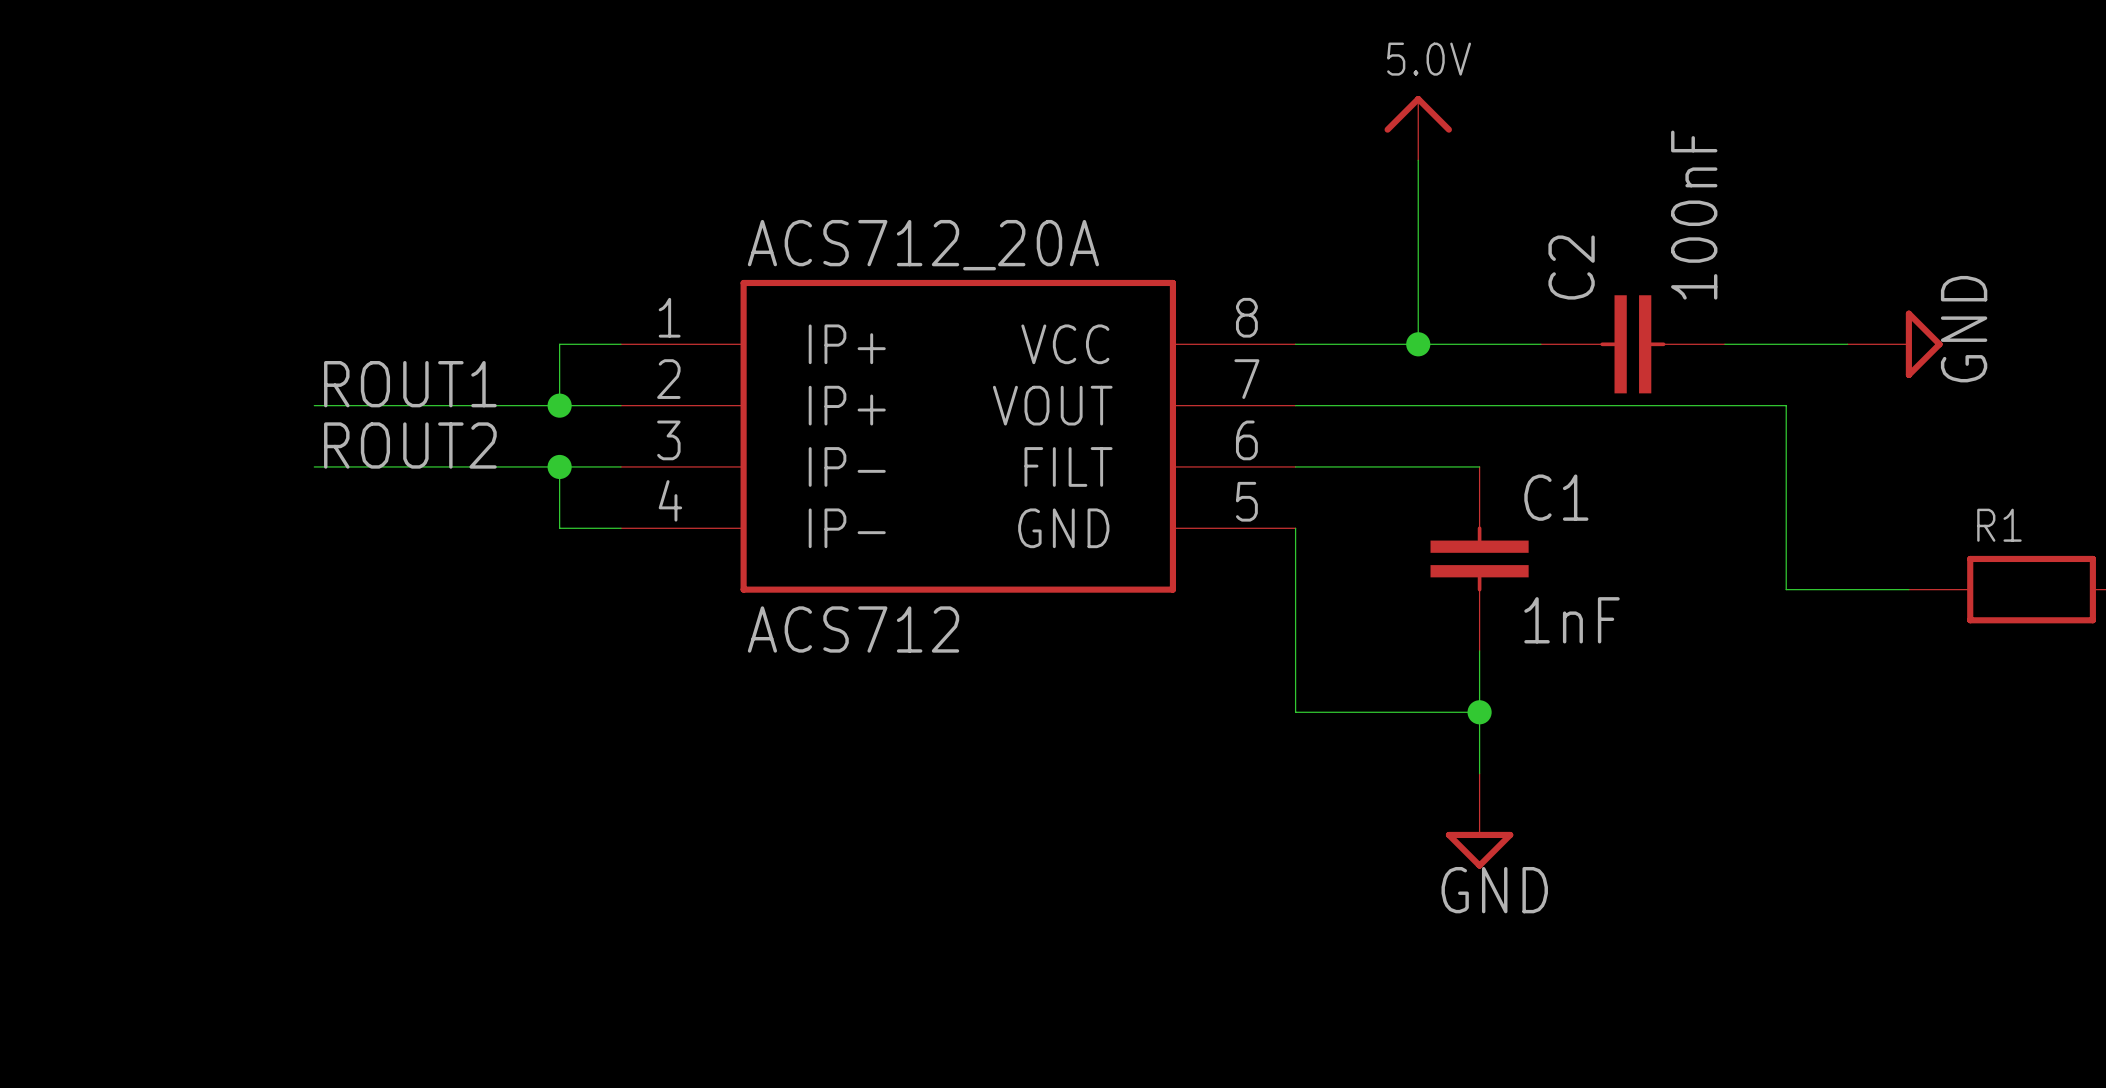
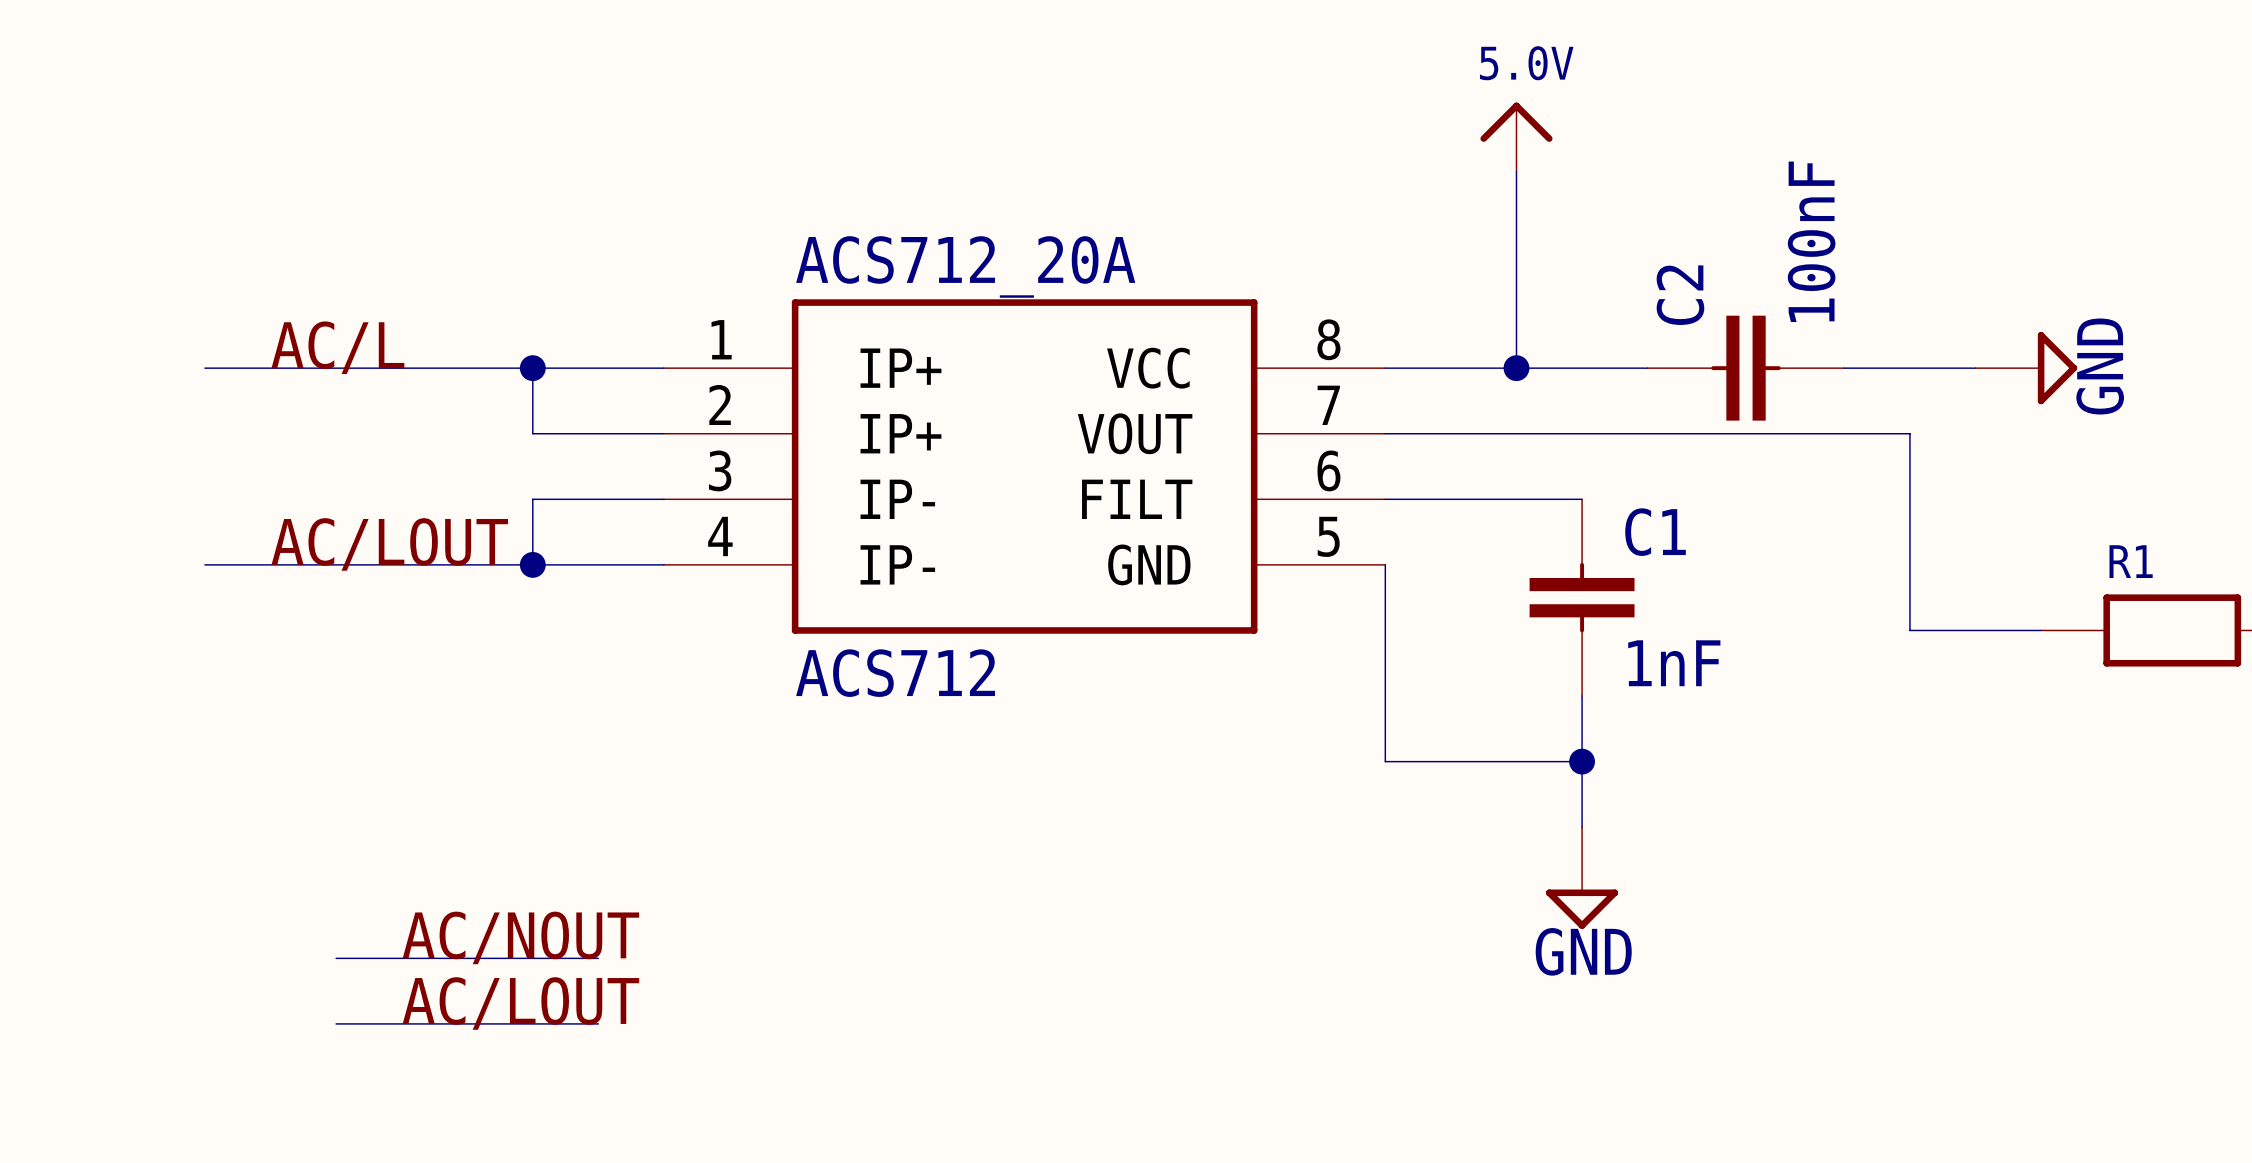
label: none -> AC/L (337, 347)
junction: none -> (532, 368)
wire: (559, 344) (559, 405) -> (598, 368) (204, 368)
label: ROUT1 (410, 384) -> none
wire: (314, 405) (498, 405) -> (532, 368) (532, 433)
junction: (559, 405) -> none
label: ROUT2 (410, 445) -> none
wire: (314, 466) (498, 466) -> (532, 564) (532, 499)
wire: (559, 466) (559, 528) -> (204, 564) (598, 564)
junction: (559, 466) -> none
label: none -> AC/LOUT (389, 544)
junction: none -> (532, 564)
label: none -> AC/NOUT (520, 937)
wire: none -> (336, 958) (598, 958)
label: none -> AC/LOUT (520, 1003)
wire: none -> (336, 1023) (598, 1023)

